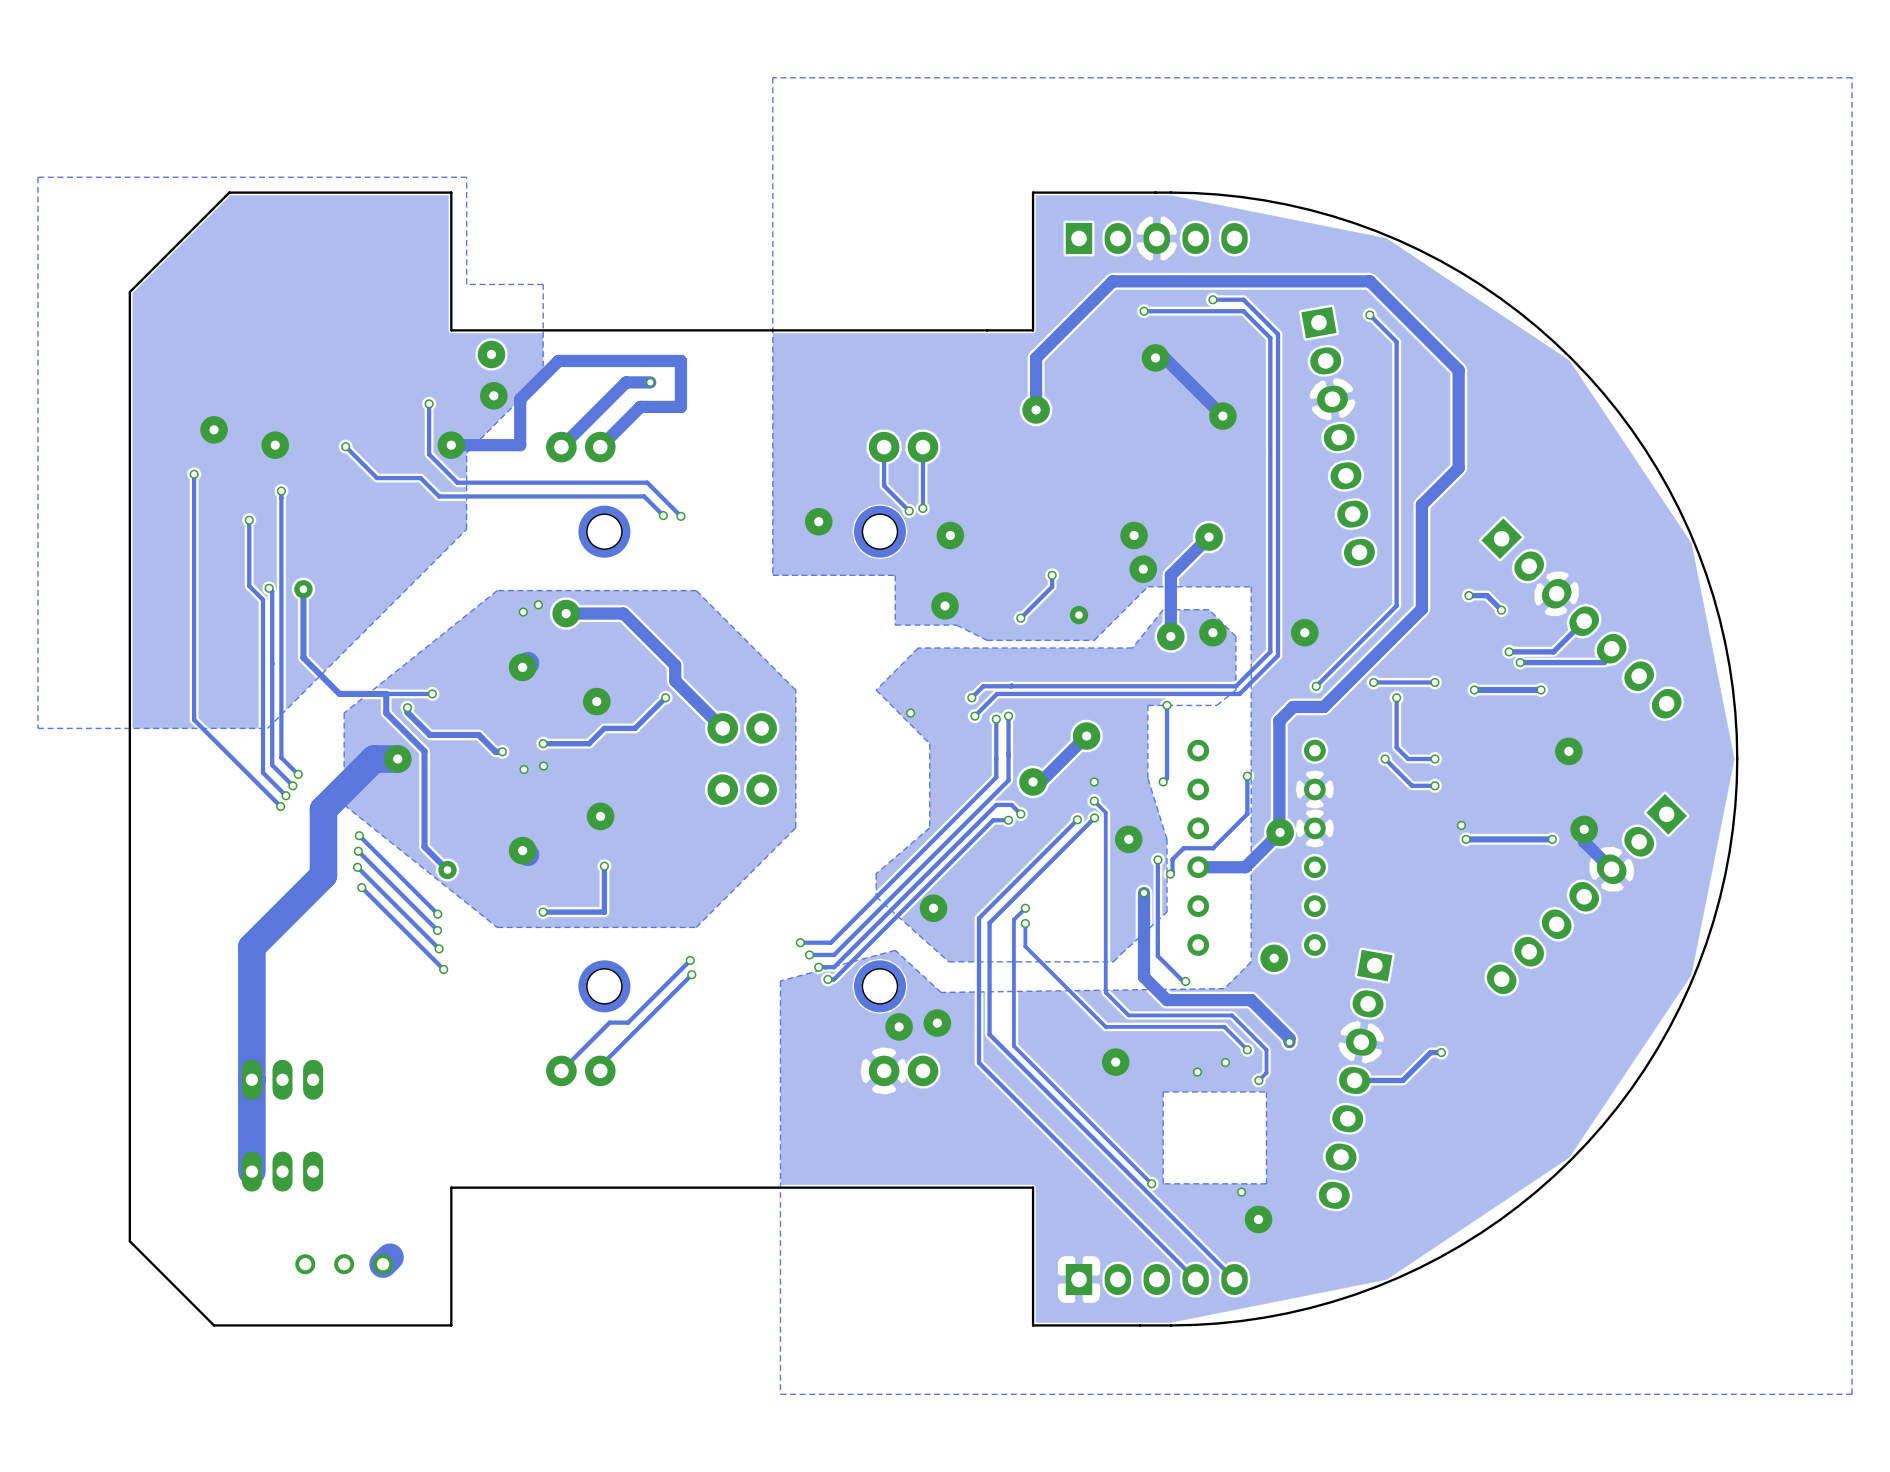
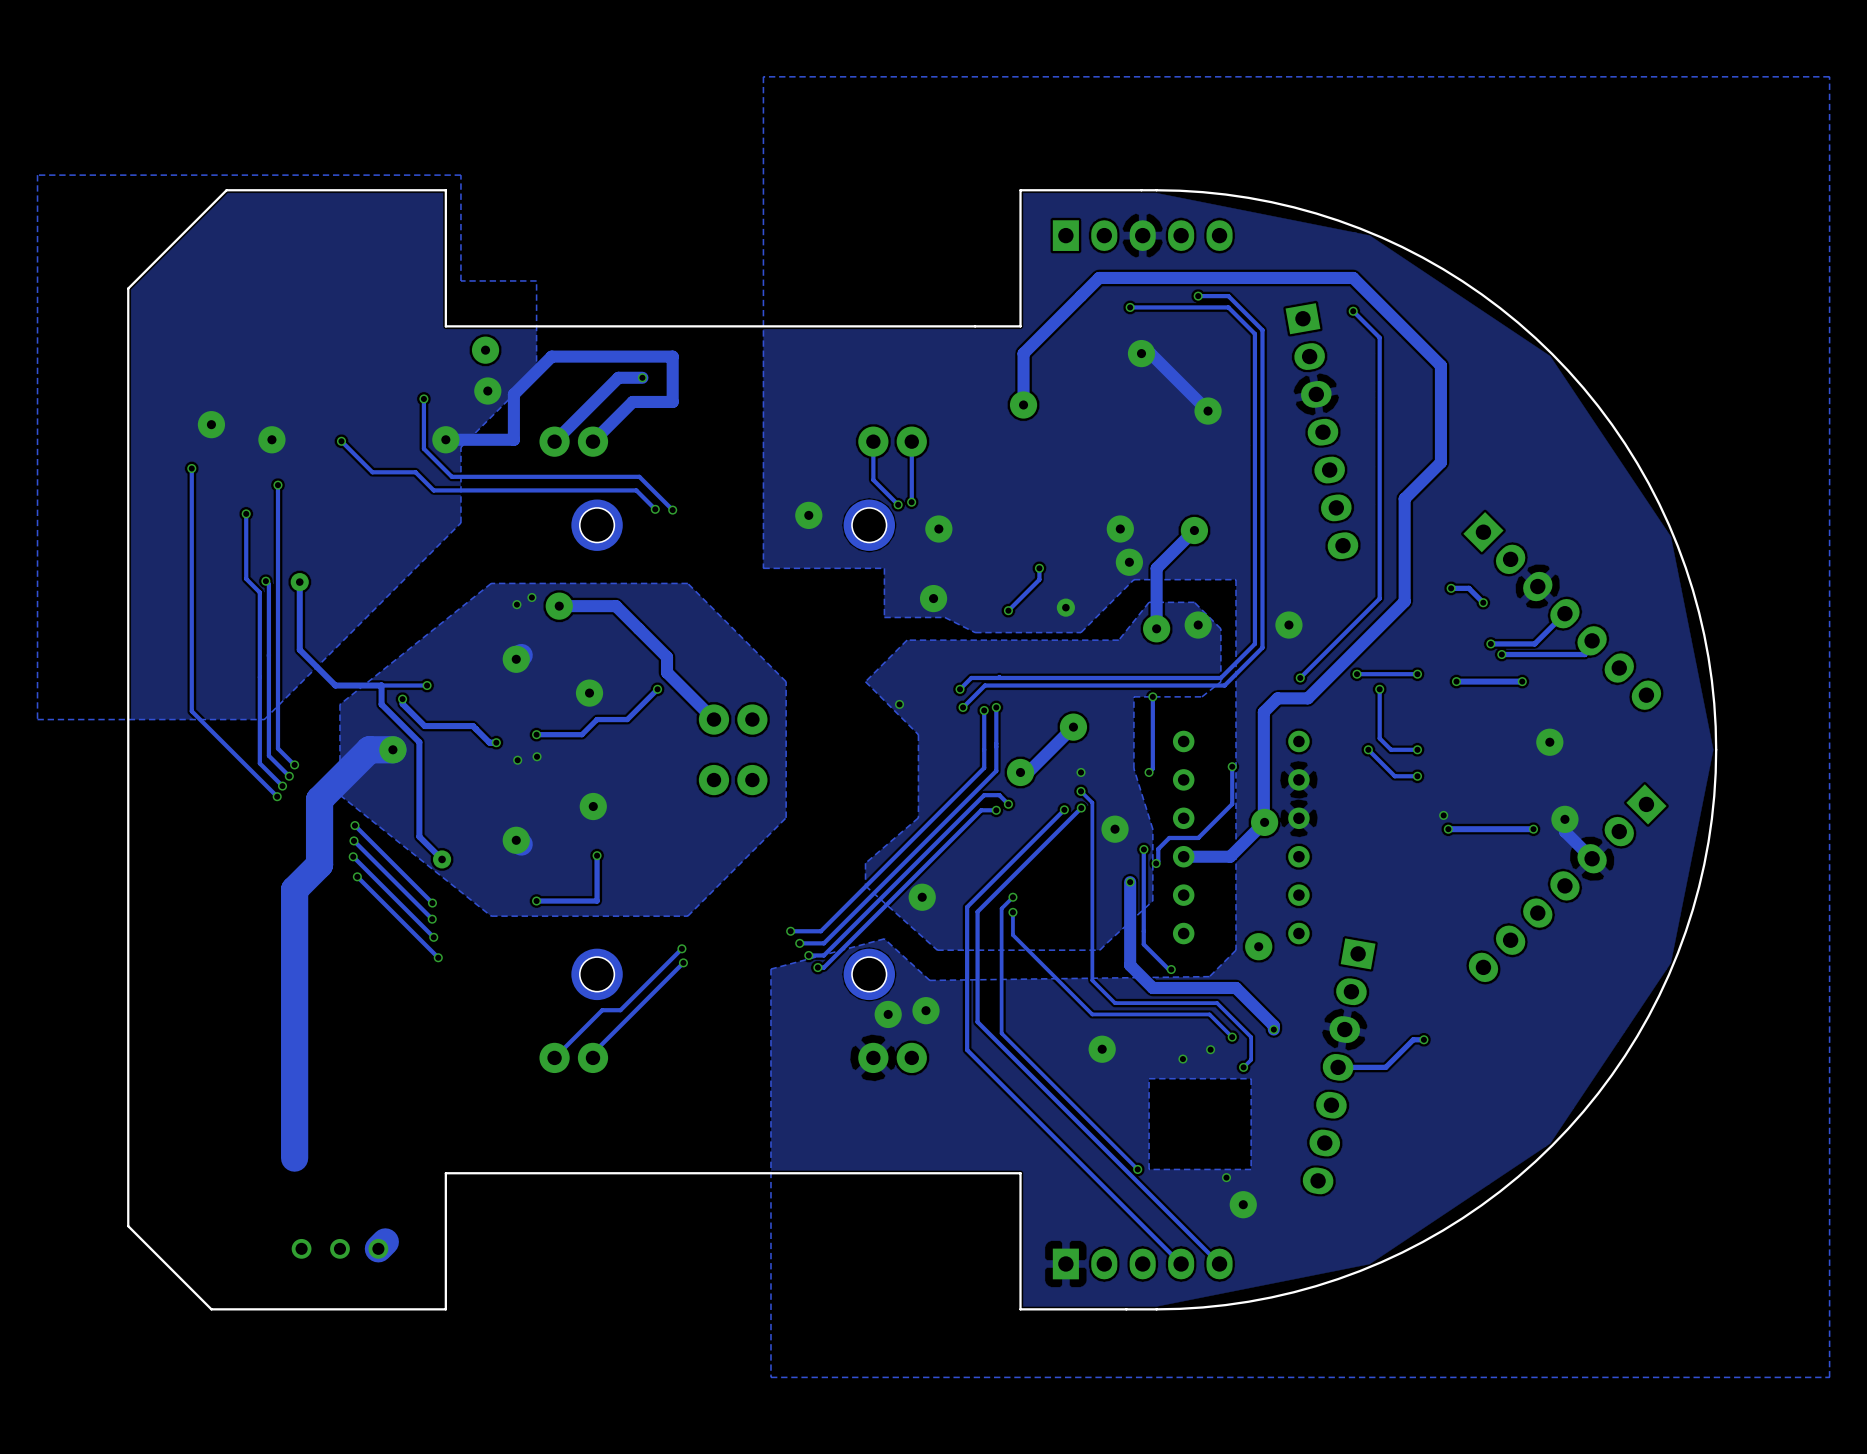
track: (298, 900) (251, 946) (251, 1171) -> (294, 889) (294, 1158)
part: (282, 1079) -> none
part: (282, 1171) -> none

